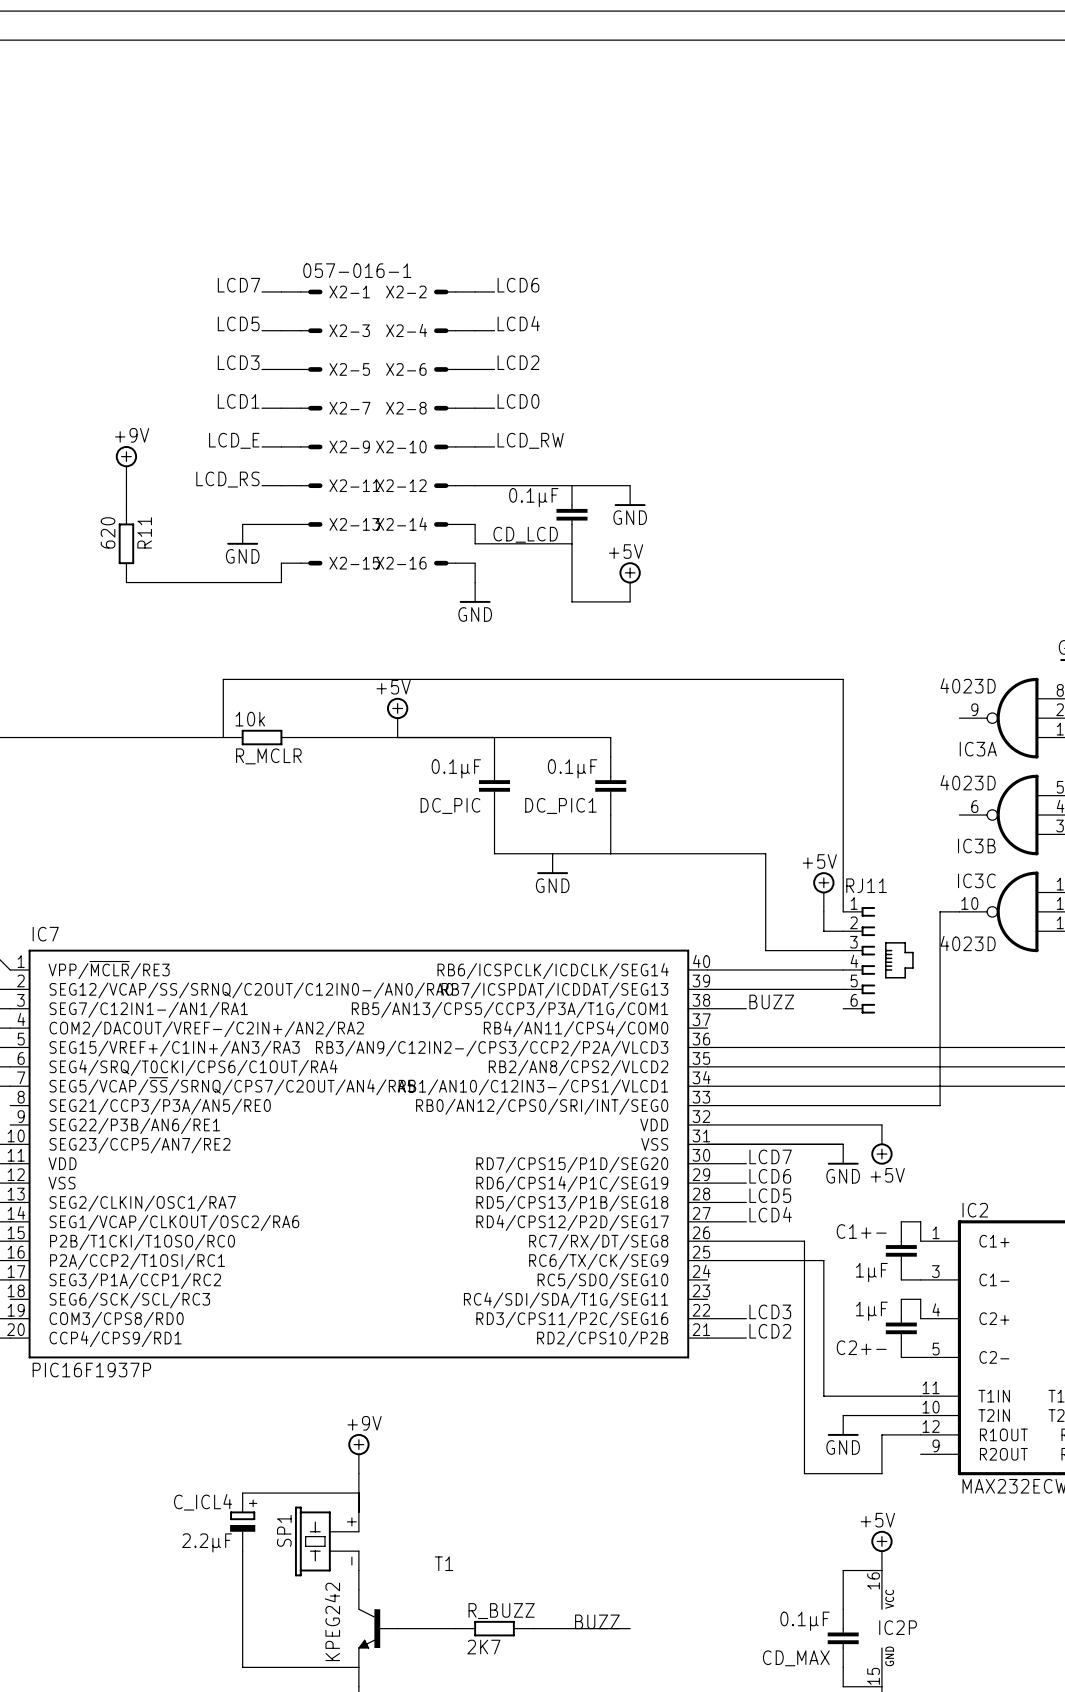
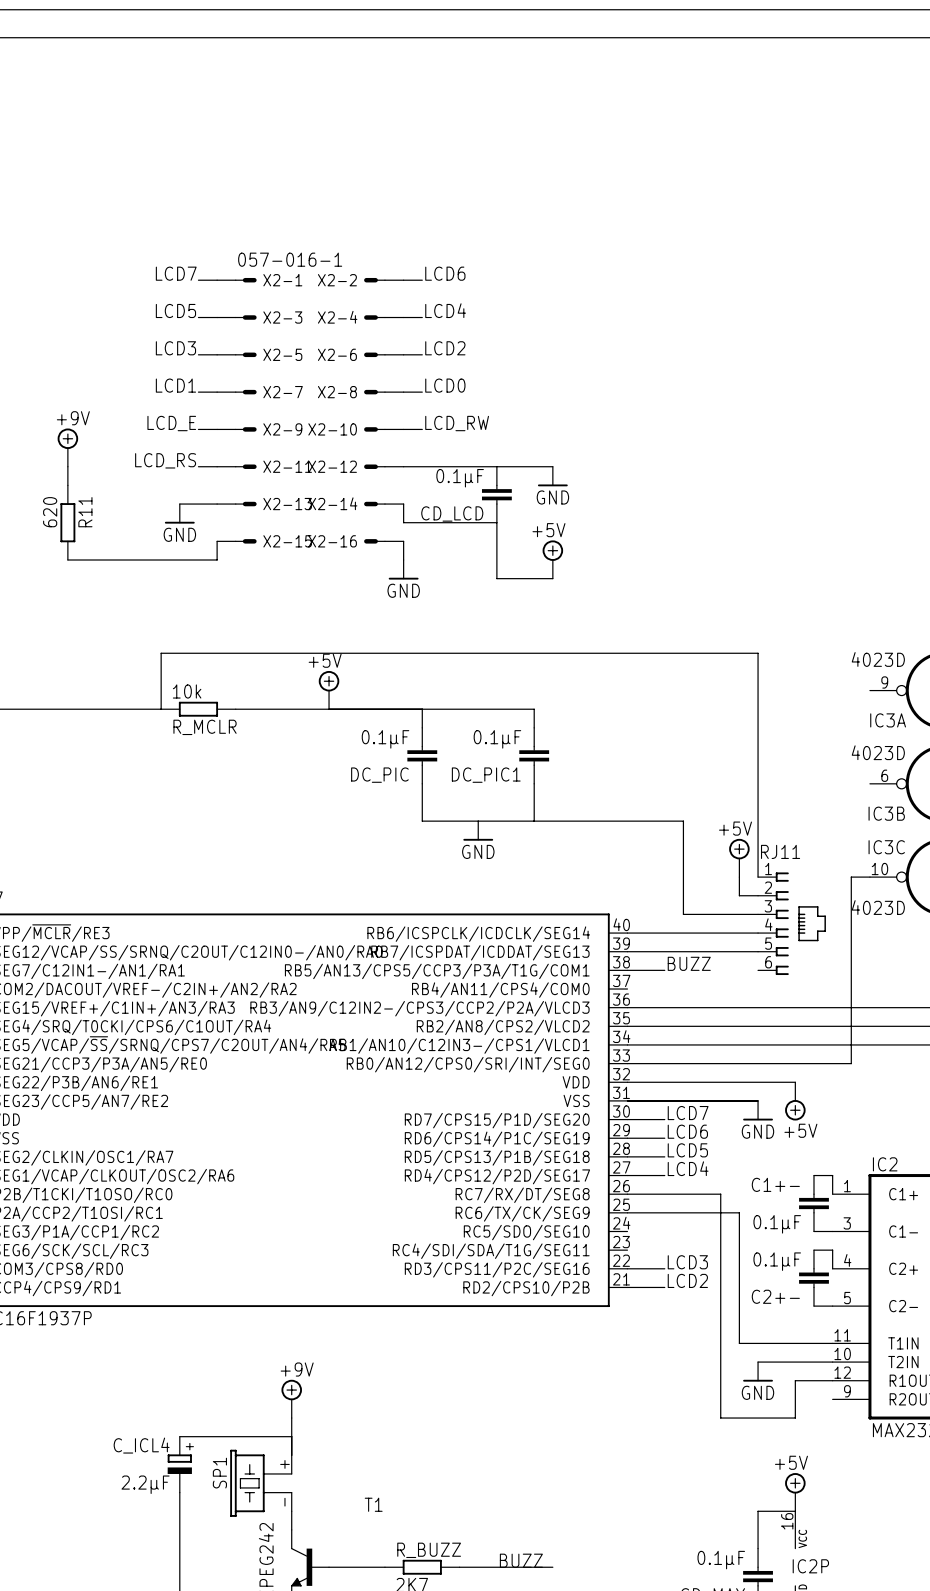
C1+- value: 1µF (871, 1272) -> 0.1µF (777, 1224)
C2+- value: 1µF (871, 1311) -> 0.1µF (777, 1261)

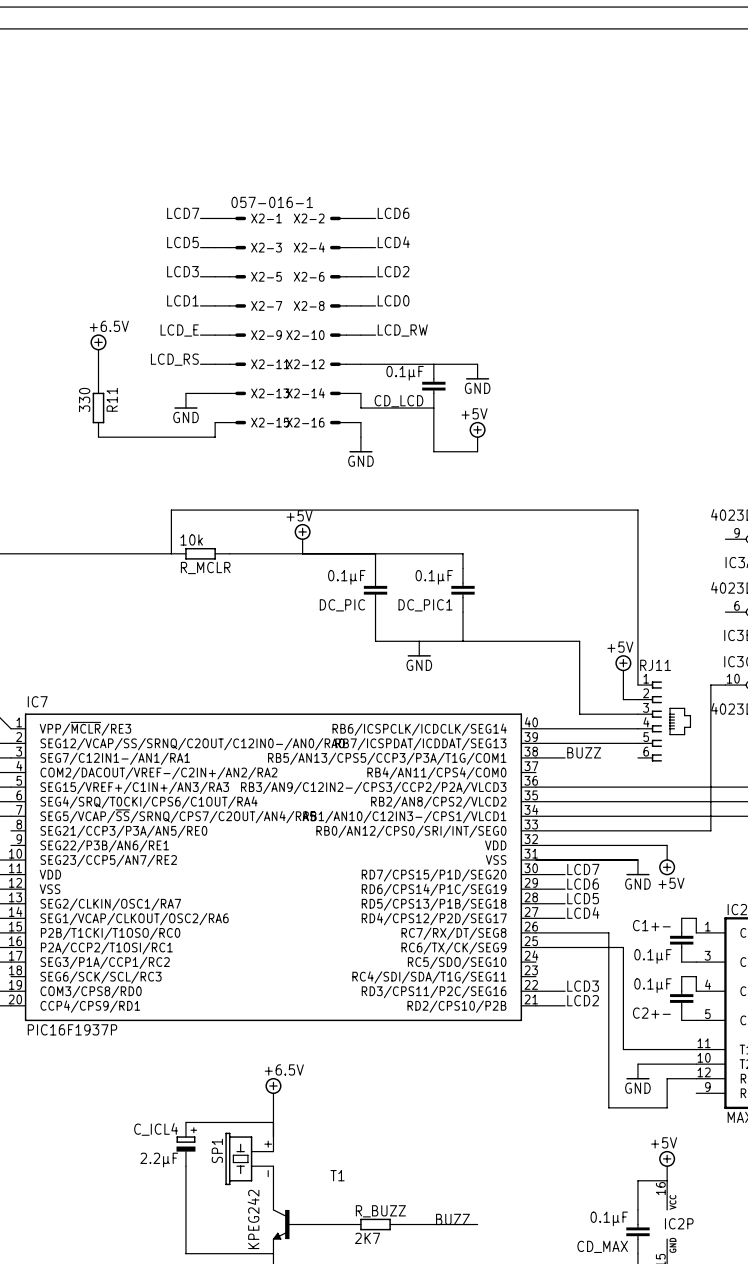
power symbol: +9V (67, 447) -> +6.5V (98, 349)
R11 value: 620 (50, 512) -> 330 (84, 400)
power symbol: +9V (291, 1398) -> +6.5V (273, 1092)

